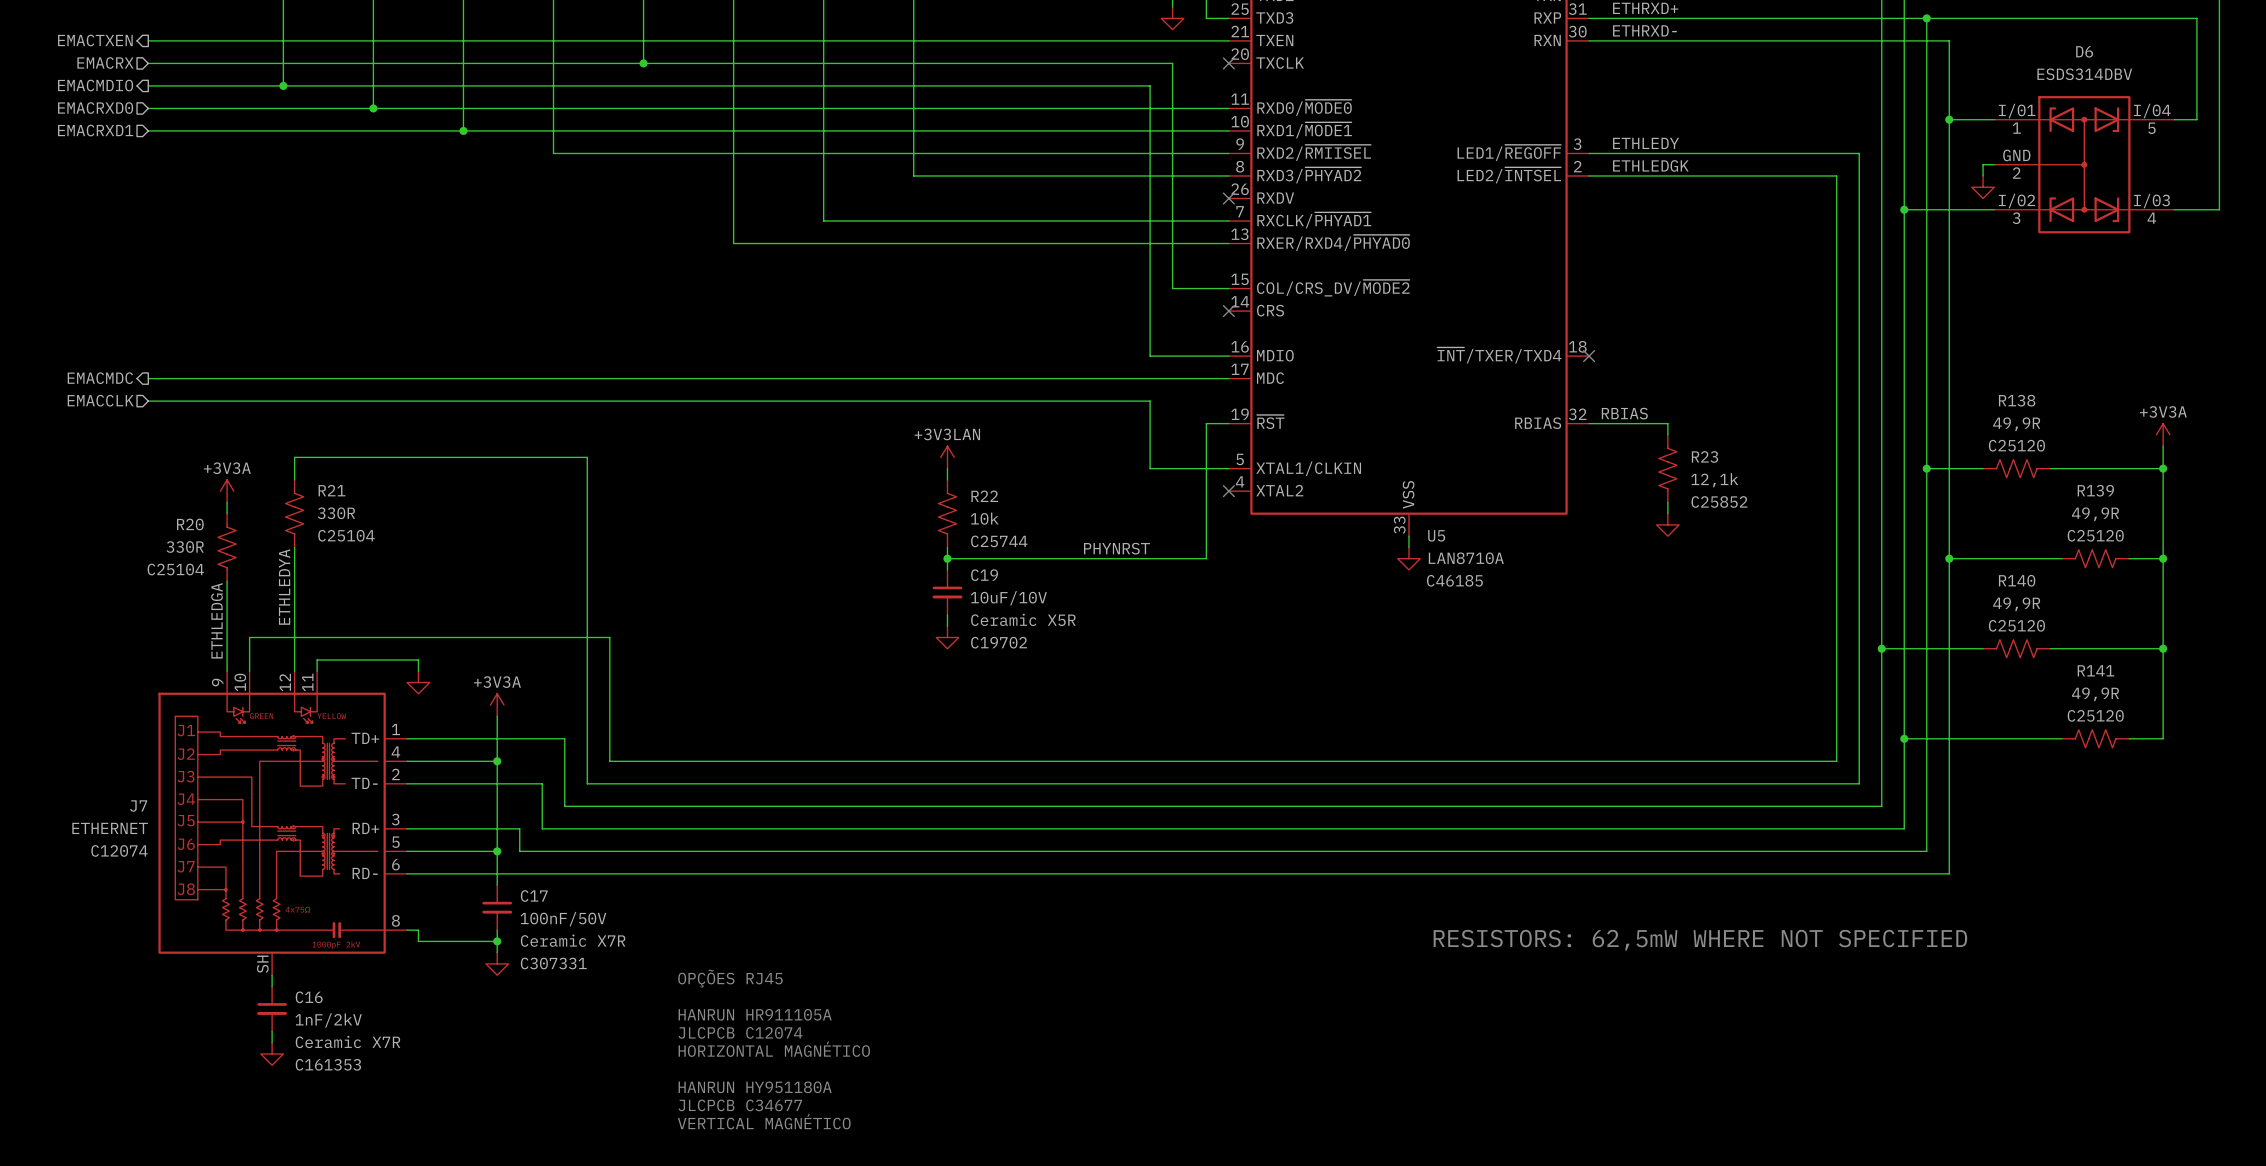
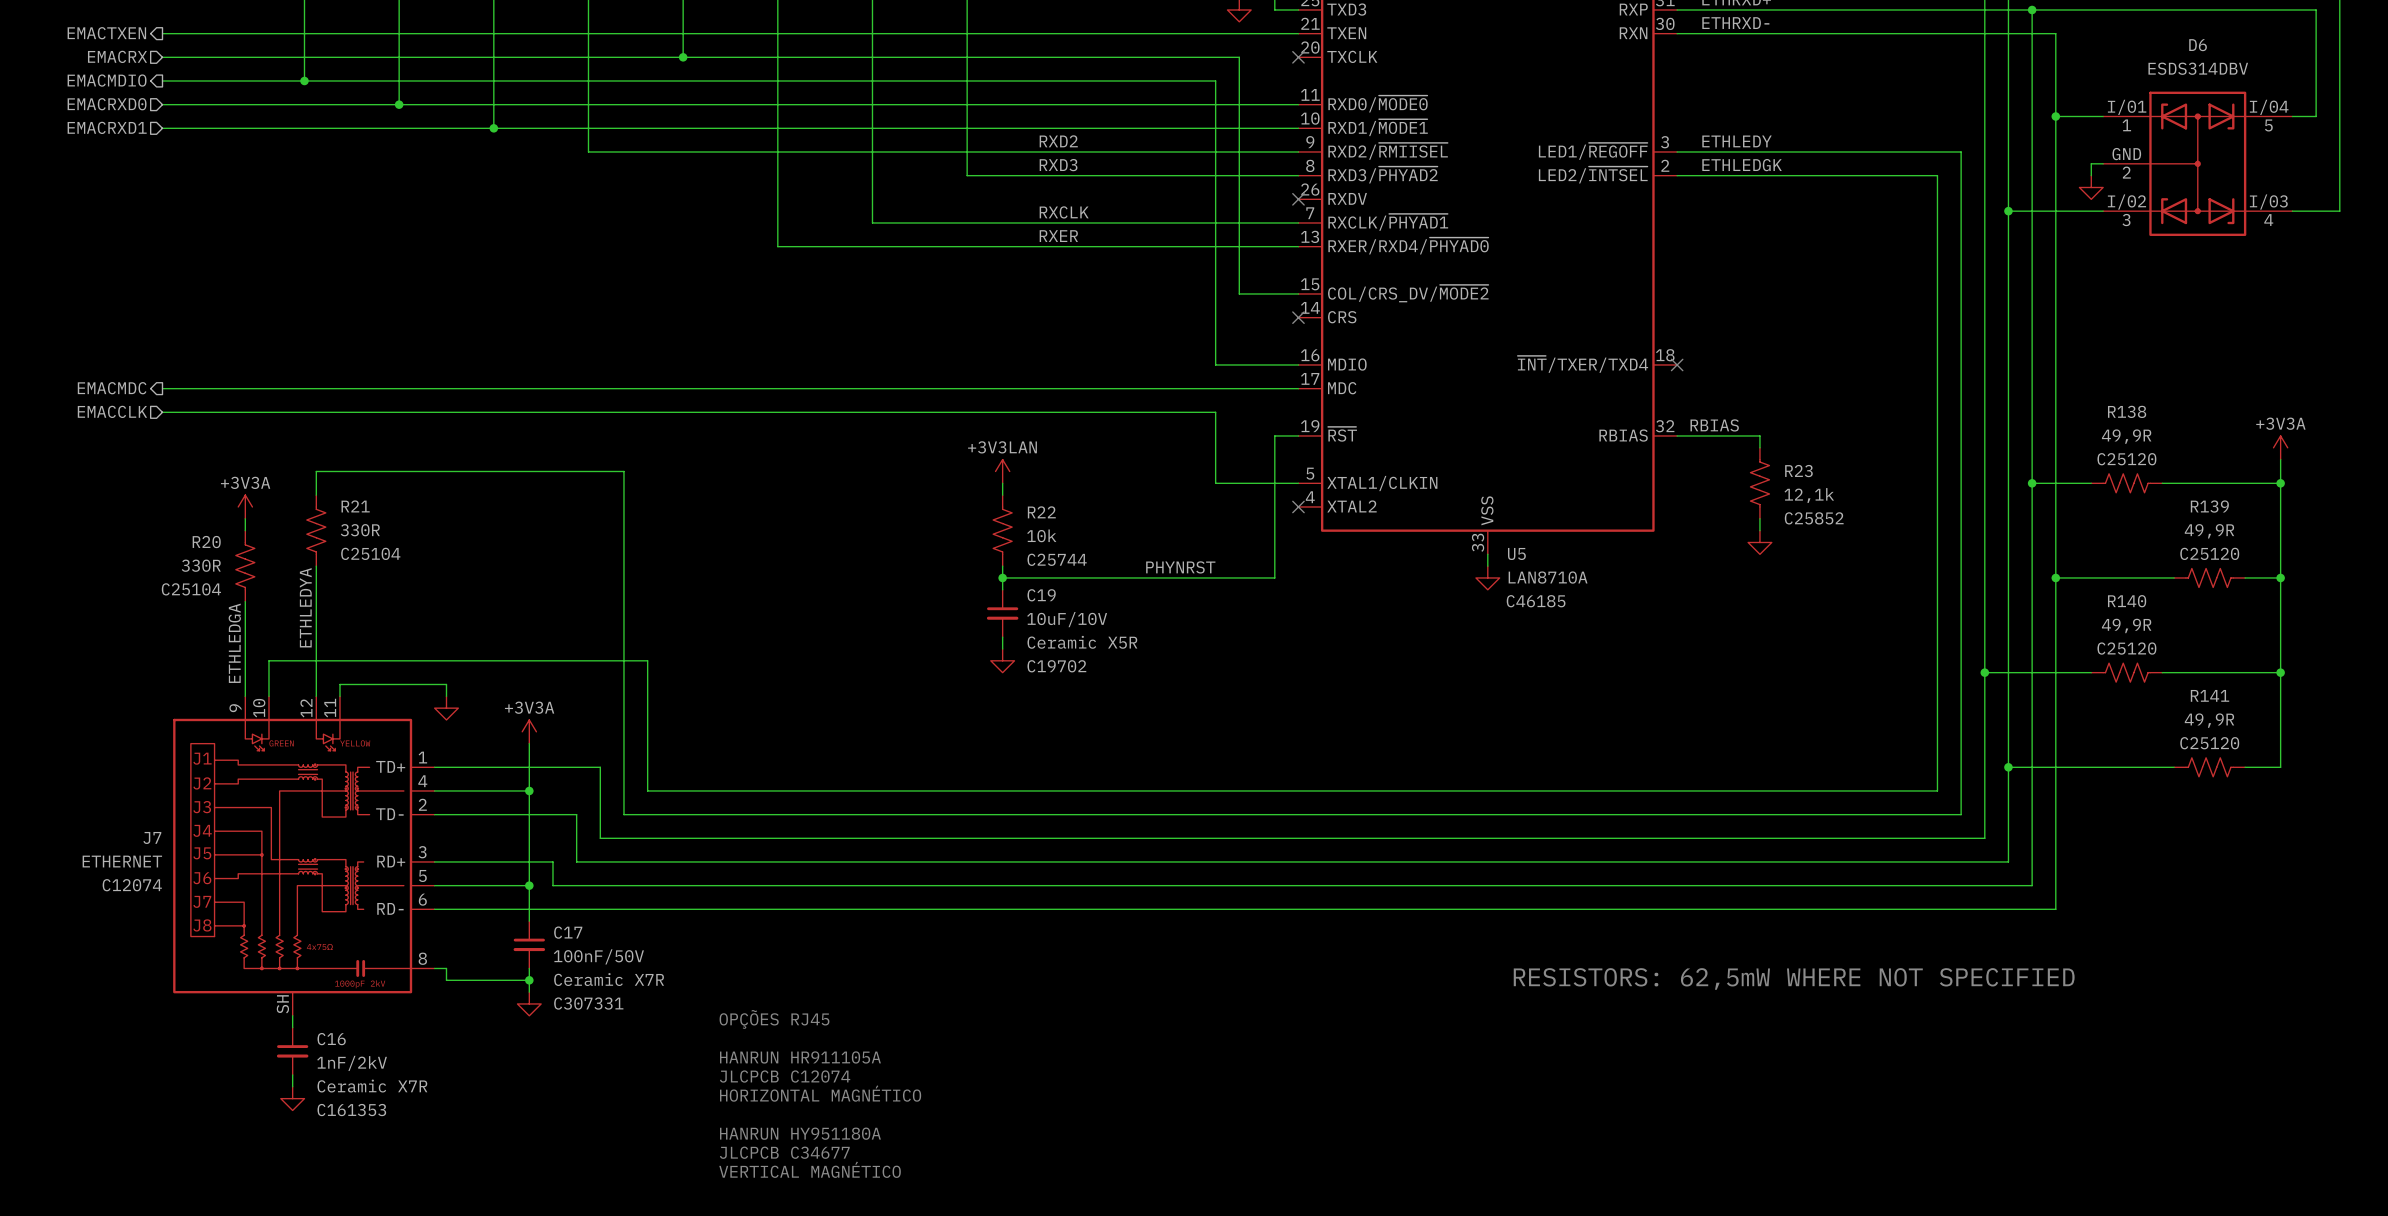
label: none -> RXD2 (1058, 141)
label: none -> RXD3 (1058, 165)
label: none -> RXCLK (1064, 212)
label: none -> RXER (1058, 236)

